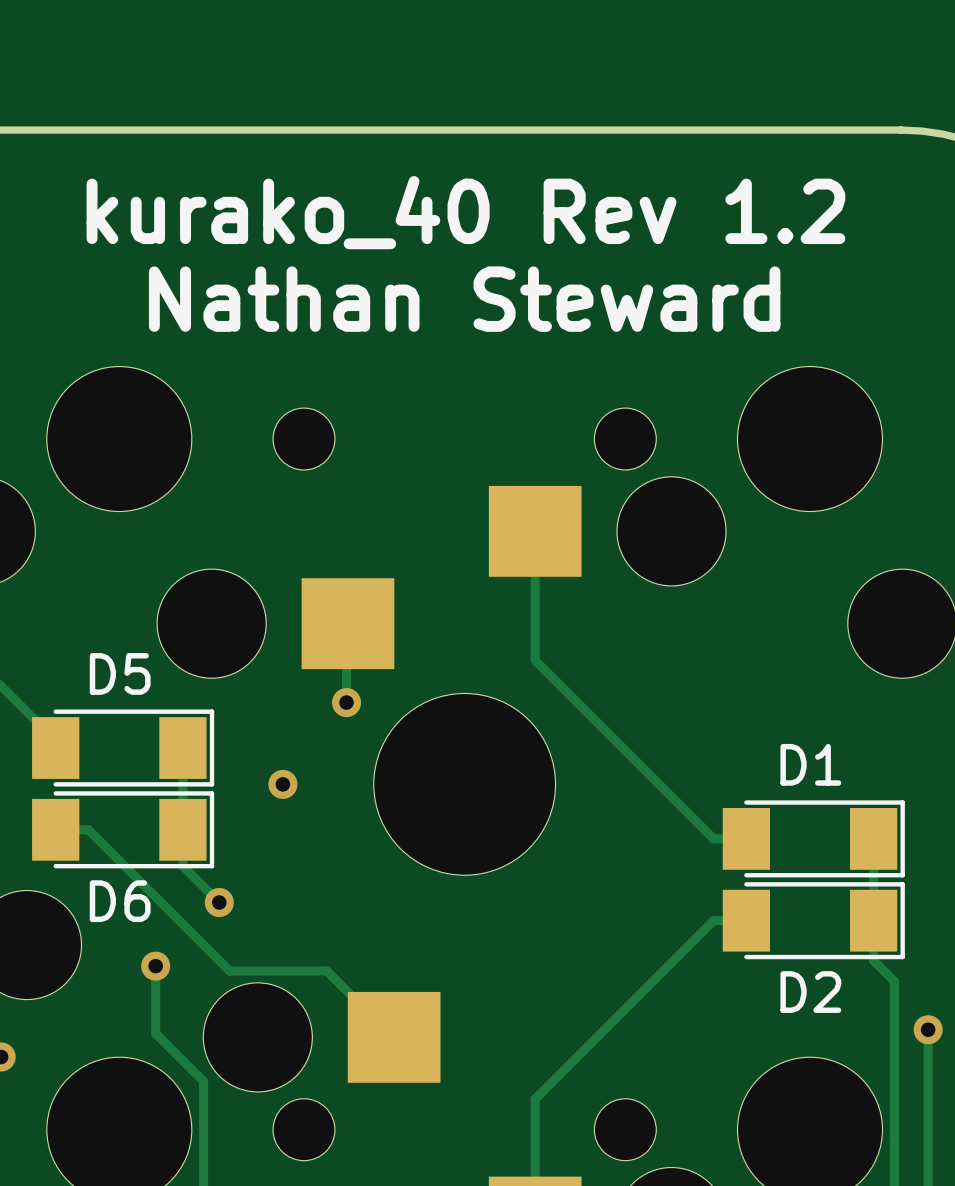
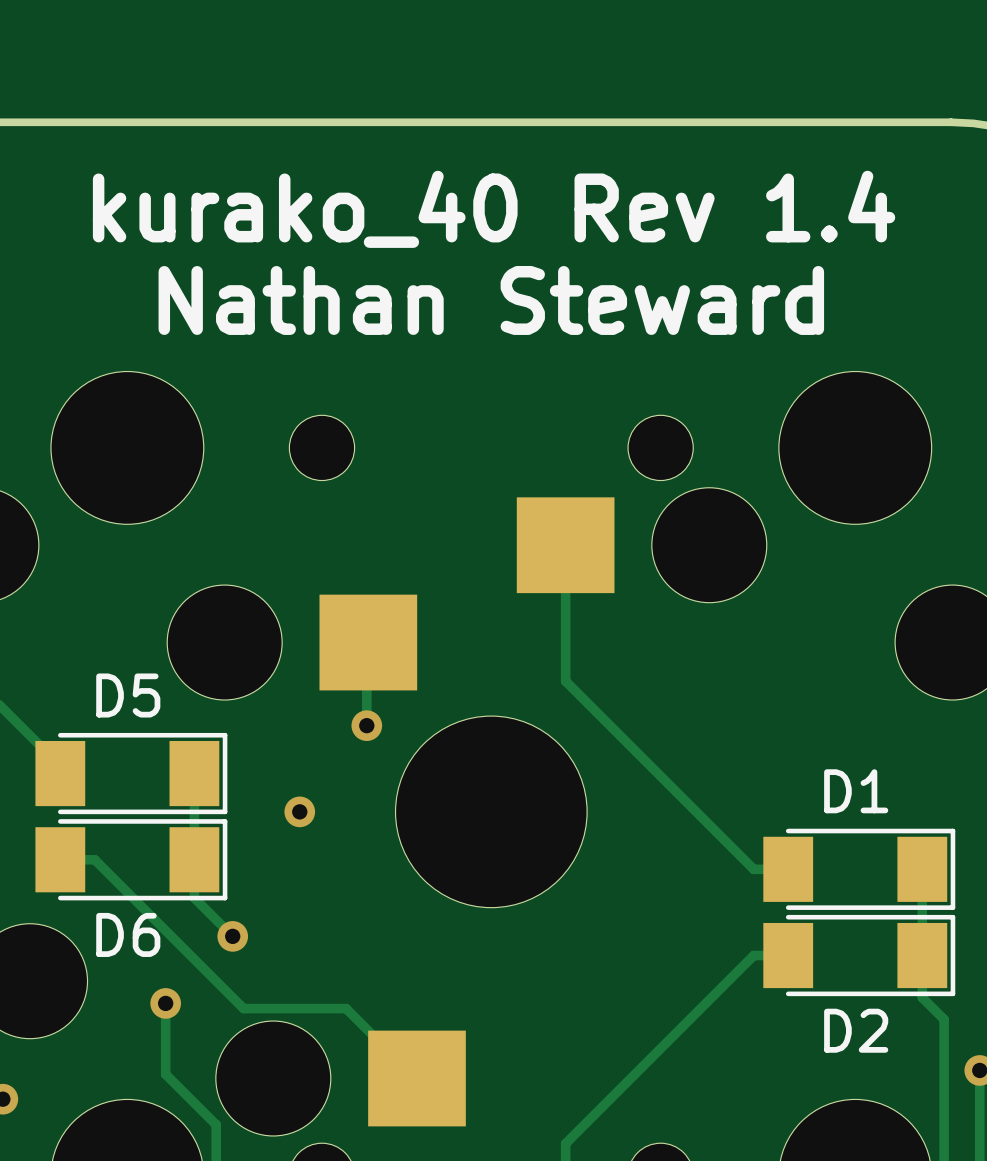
text: kurako_40 Rev 1.2 (465, 212) -> kurako_40 Rev 1.4 (494, 209)

